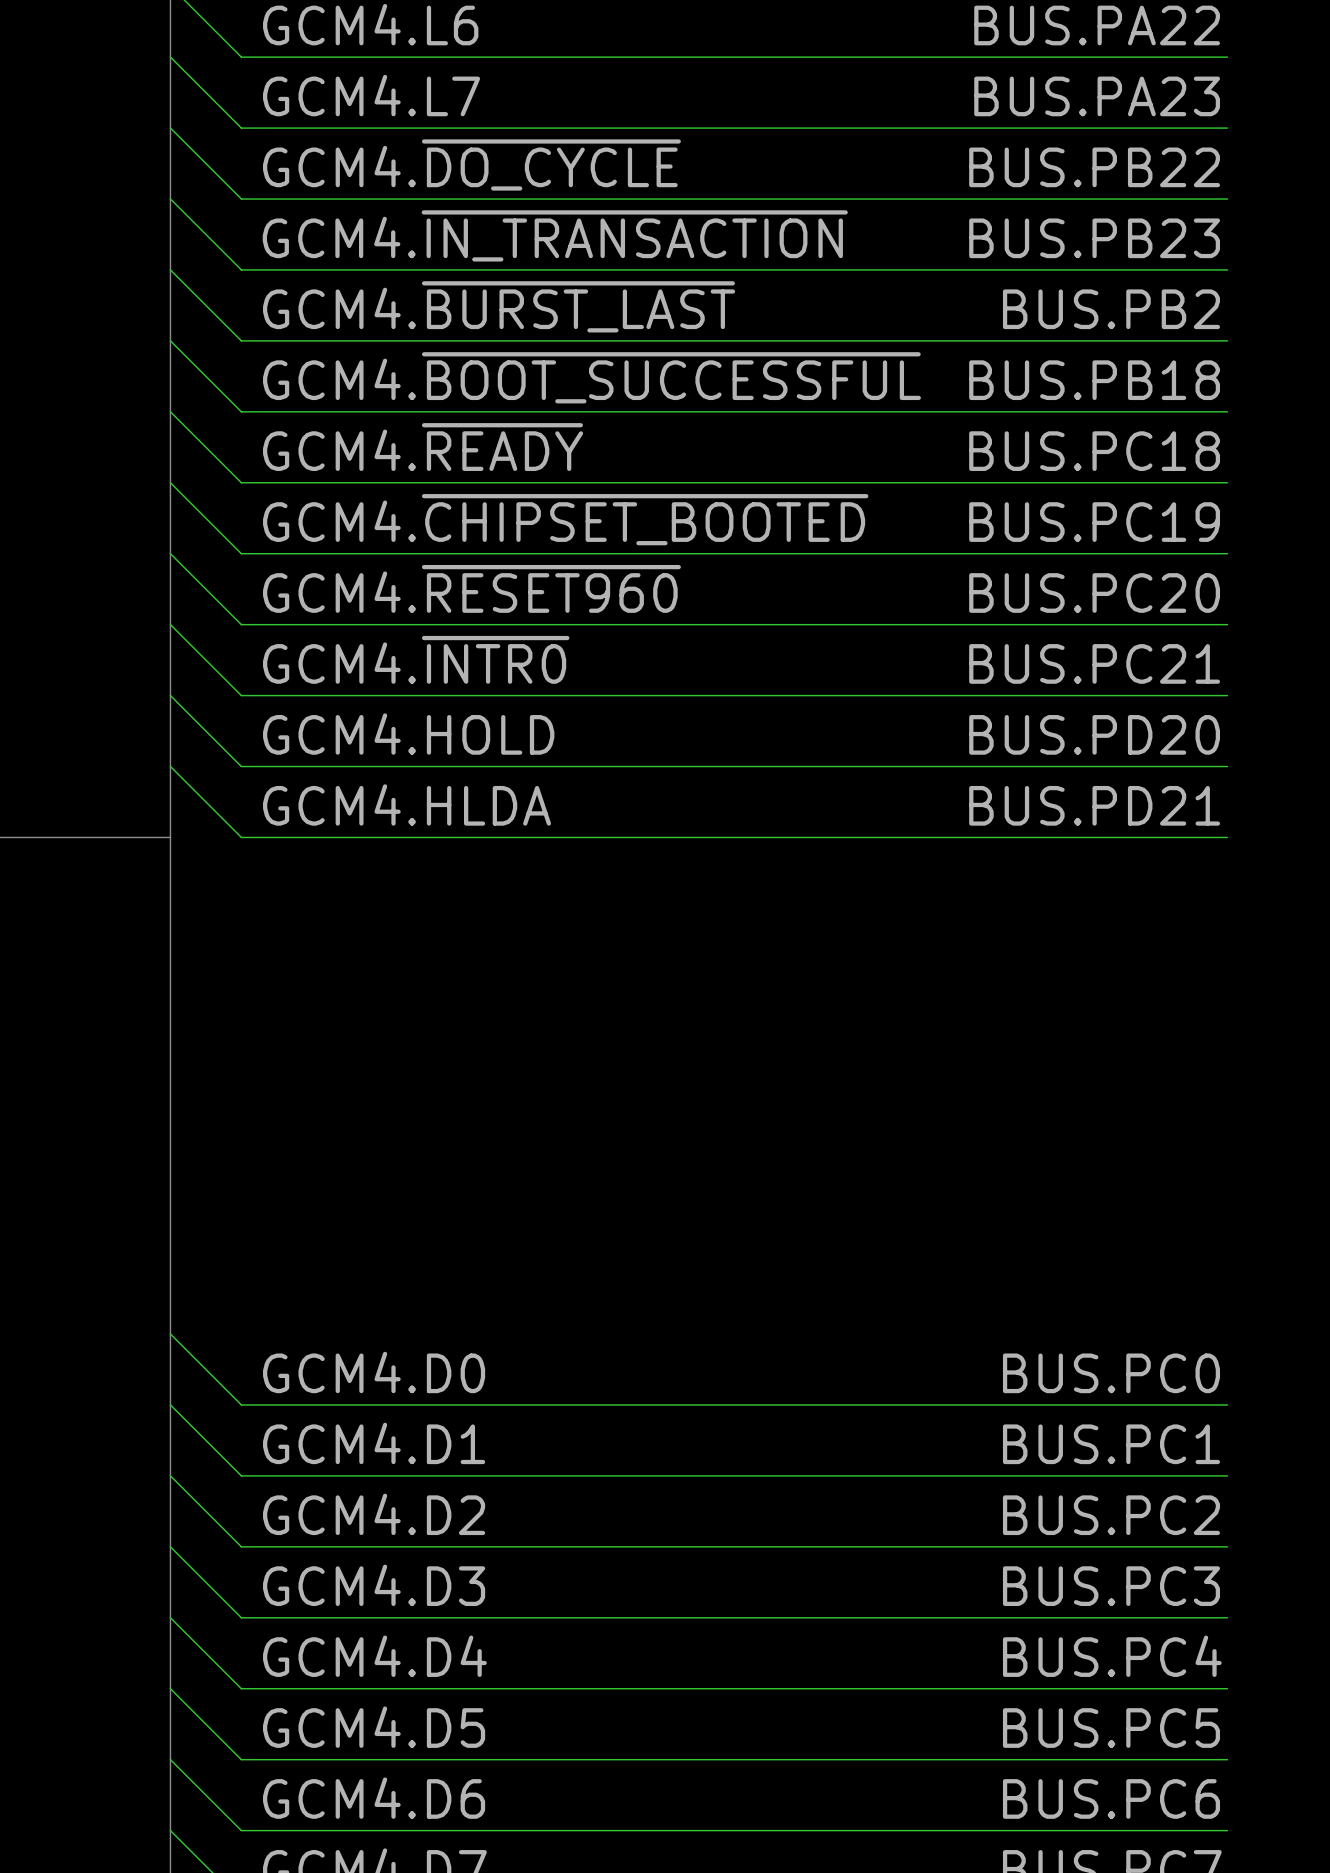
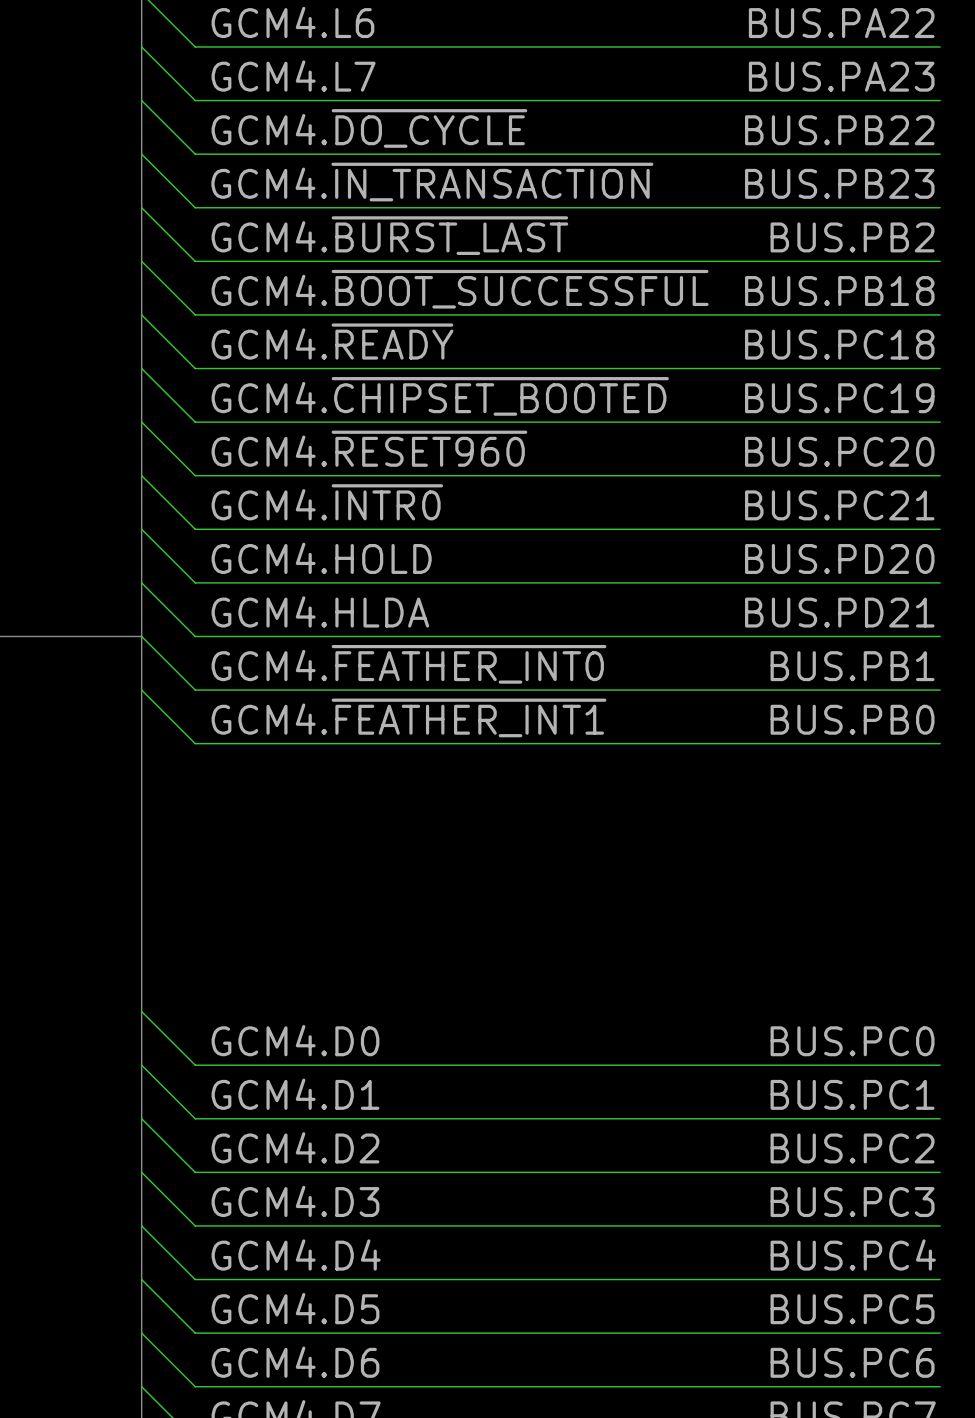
wire: none -> (141, 636) (195, 690) (940, 690)
label: none -> GCM4.~{FEATHER_INT0} (408, 664)
label: none -> BUS.PB1 (852, 666)
wire: none -> (141, 690) (195, 743) (940, 743)
label: none -> GCM4.~{FEATHER_INT1} (408, 717)
label: none -> BUS.PB0 (852, 719)

